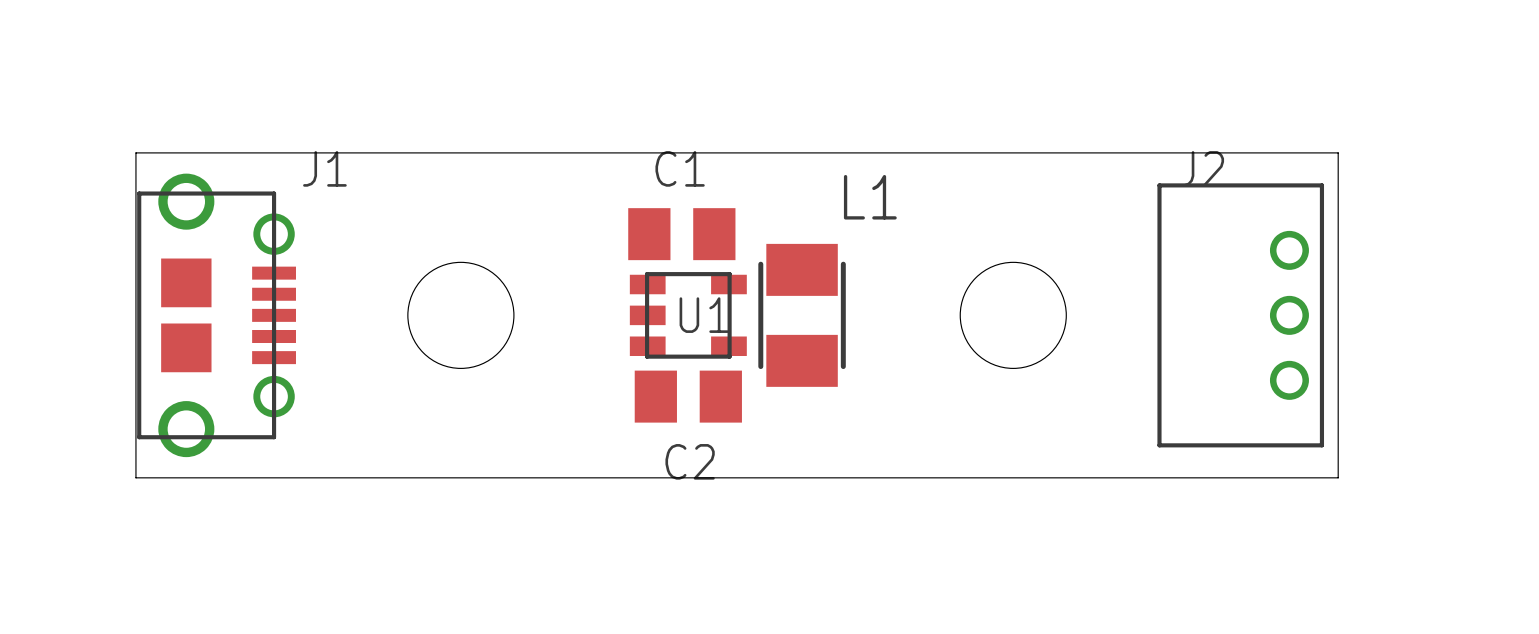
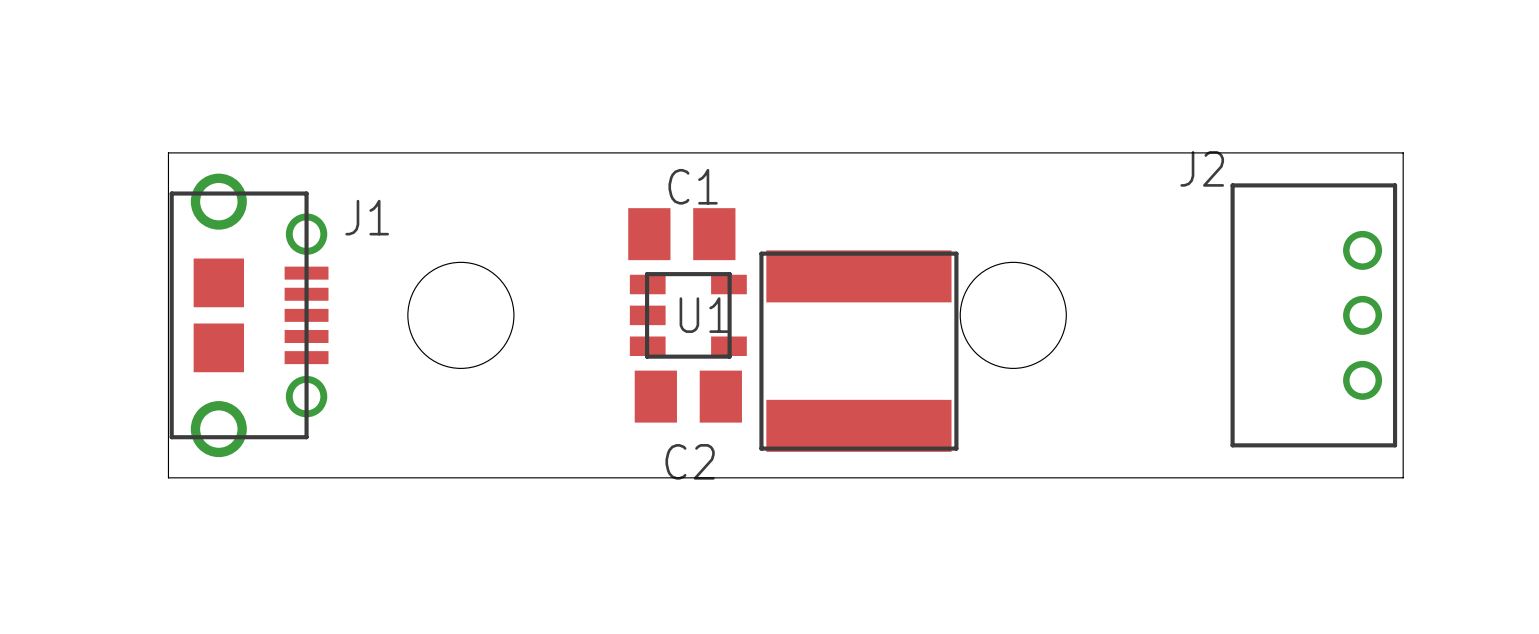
board edge: (168, 152) (135, 152) (135, 477) (168, 477) -> (168, 152) (168, 477)
board edge: (1338, 152) (1338, 477) -> (1338, 152) (1403, 152) (1403, 477) (1338, 477)
text position: J1 (324, 168) -> J1 (367, 217)
C1 name position: C1 (680, 168) -> C1 (693, 186)
part position: (216, 315) -> (249, 315)
L1: (802, 315) -> none
part position: (1240, 315) -> (1313, 315)
part: none -> (858, 351)

